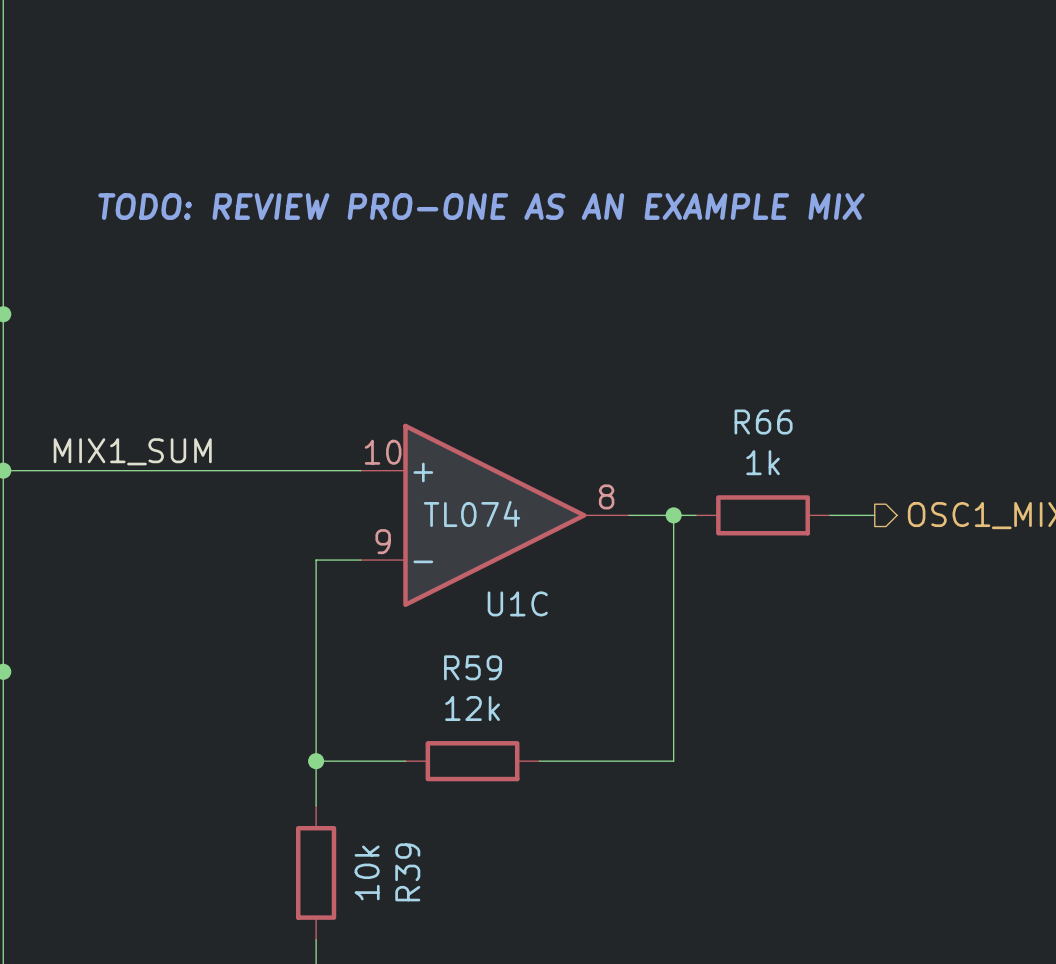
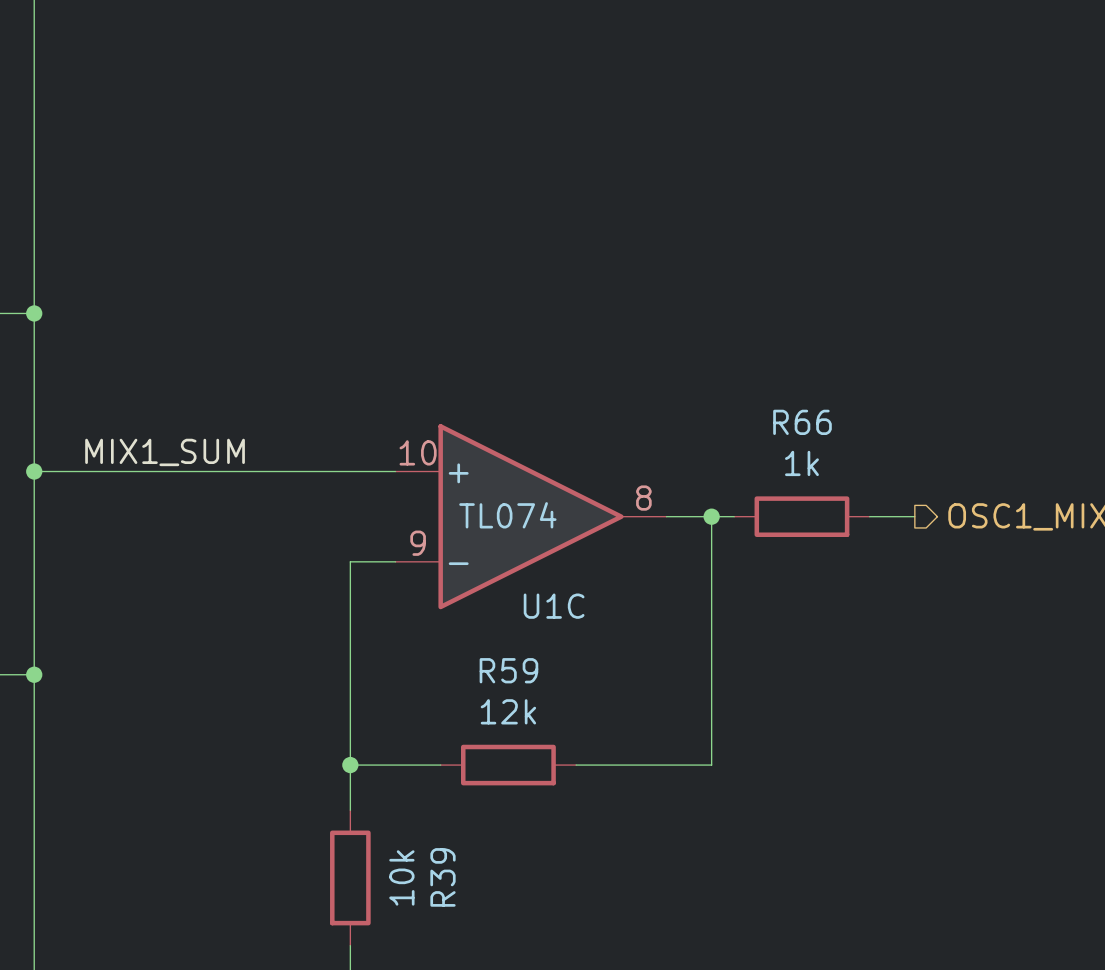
text: TODO: REVIEW PRO-ONE AS AN EXAMPLE MIX (481, 206) -> none

